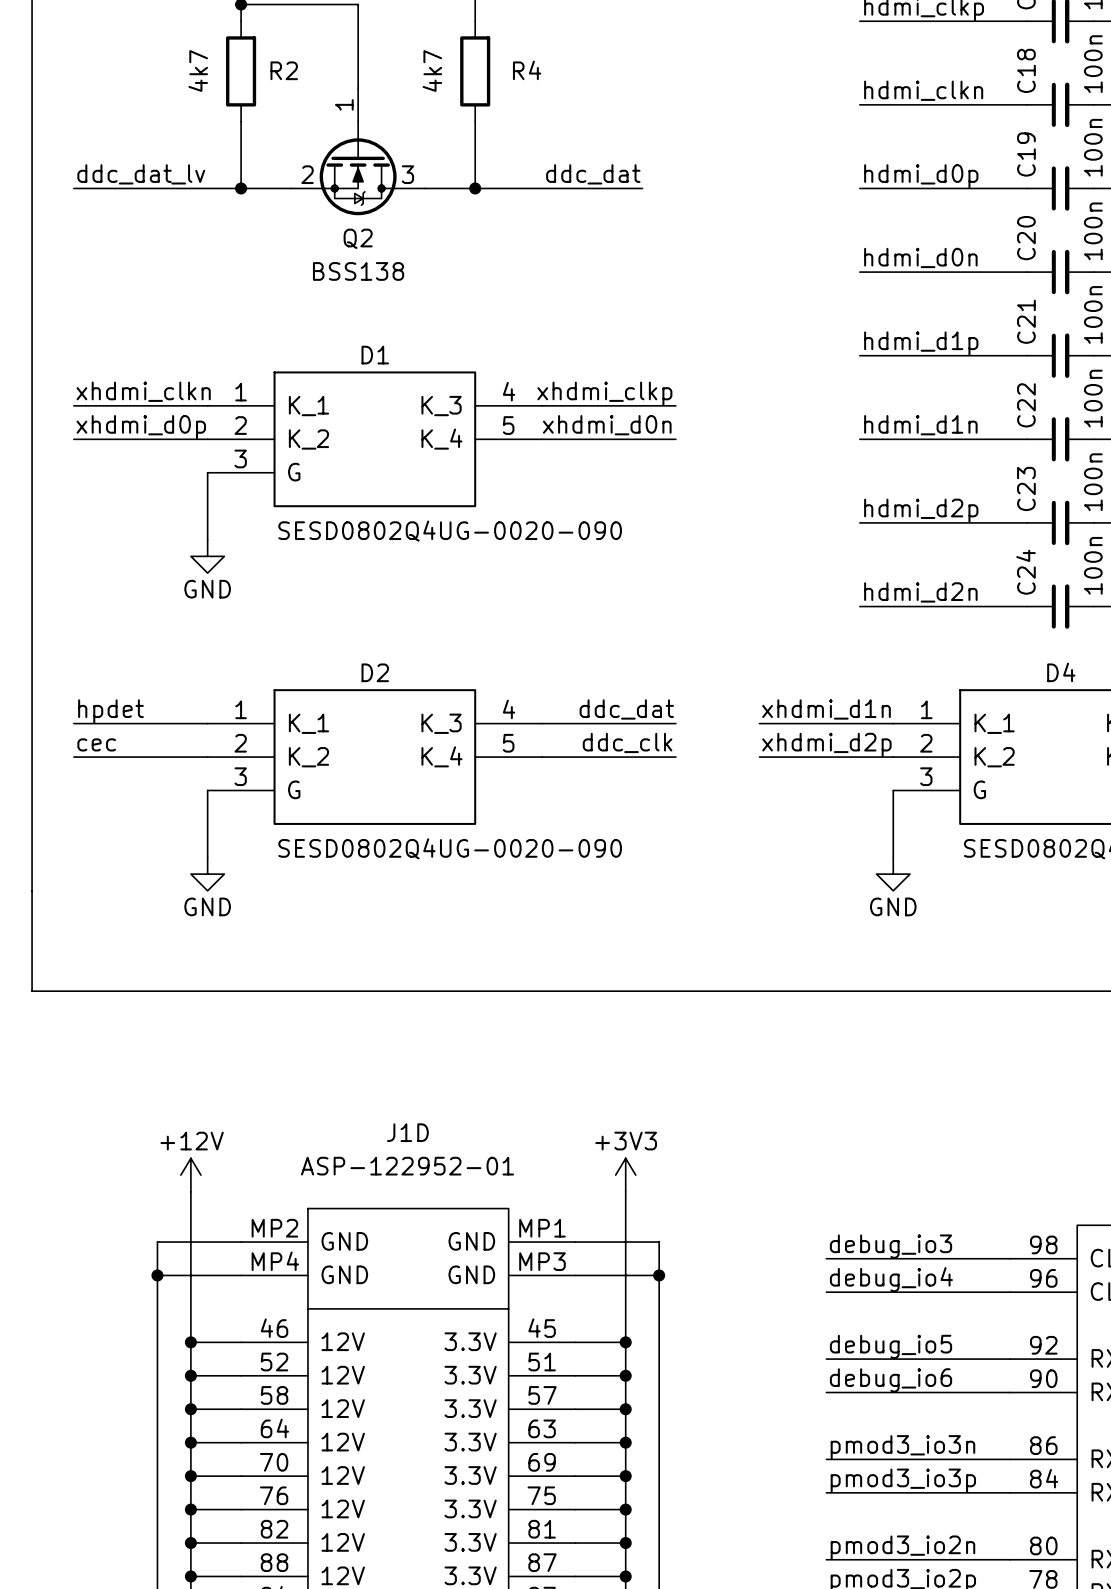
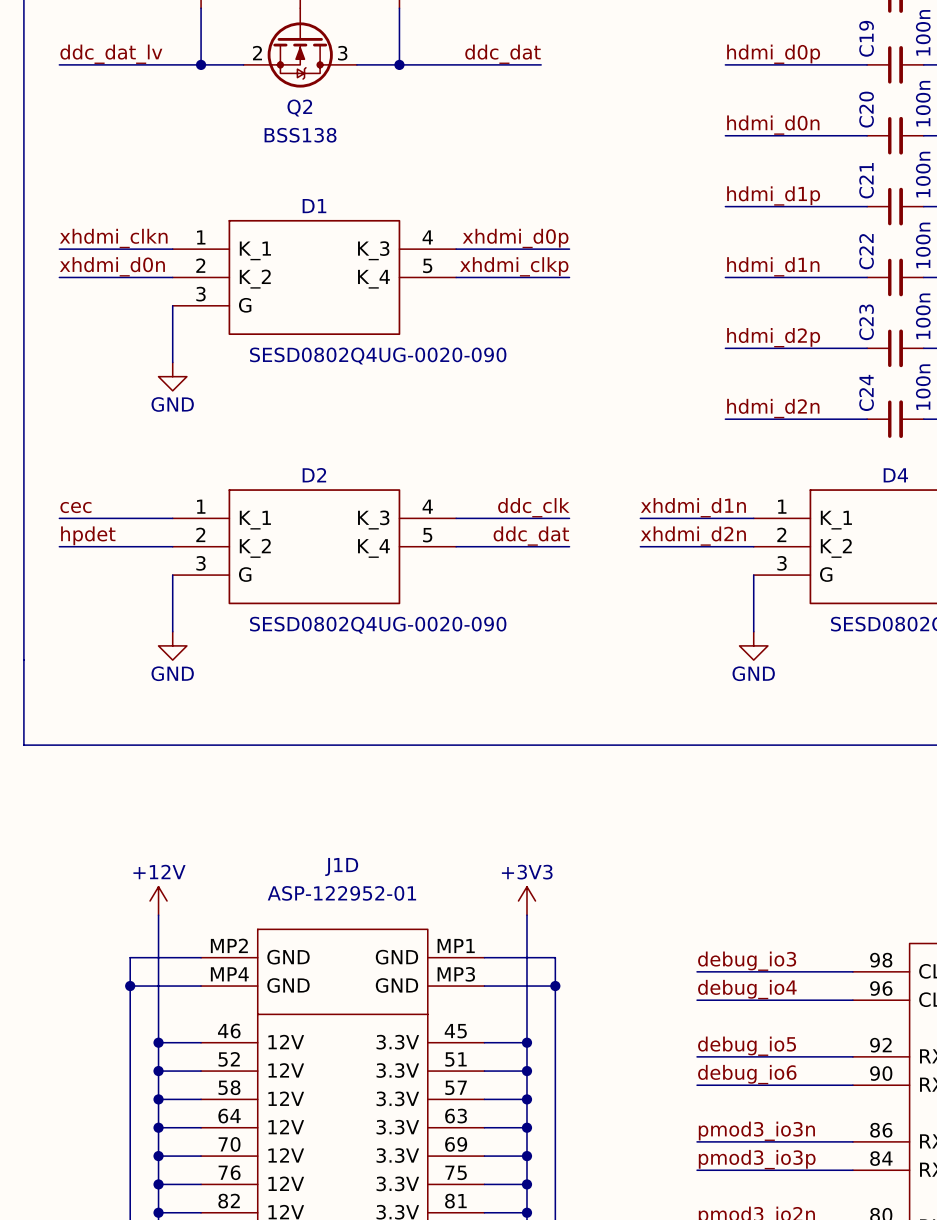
label: xhdmi_clkp (604, 393) -> xhdmi_d0p (515, 238)
label: xhdmi_d0n (607, 425) -> xhdmi_clkp (514, 266)
label: xhdmi_d0p (141, 427) -> xhdmi_d0n (112, 266)
label: ddc_dat (626, 709) -> ddc_clk (533, 507)
label: hpdet (111, 711) -> cec (75, 507)
label: ddc_clk (627, 742) -> ddc_dat (531, 536)
label: cec (96, 744) -> hpdet (88, 535)
label: xhdmi_d2p (826, 744) -> xhdmi_d2n (693, 536)

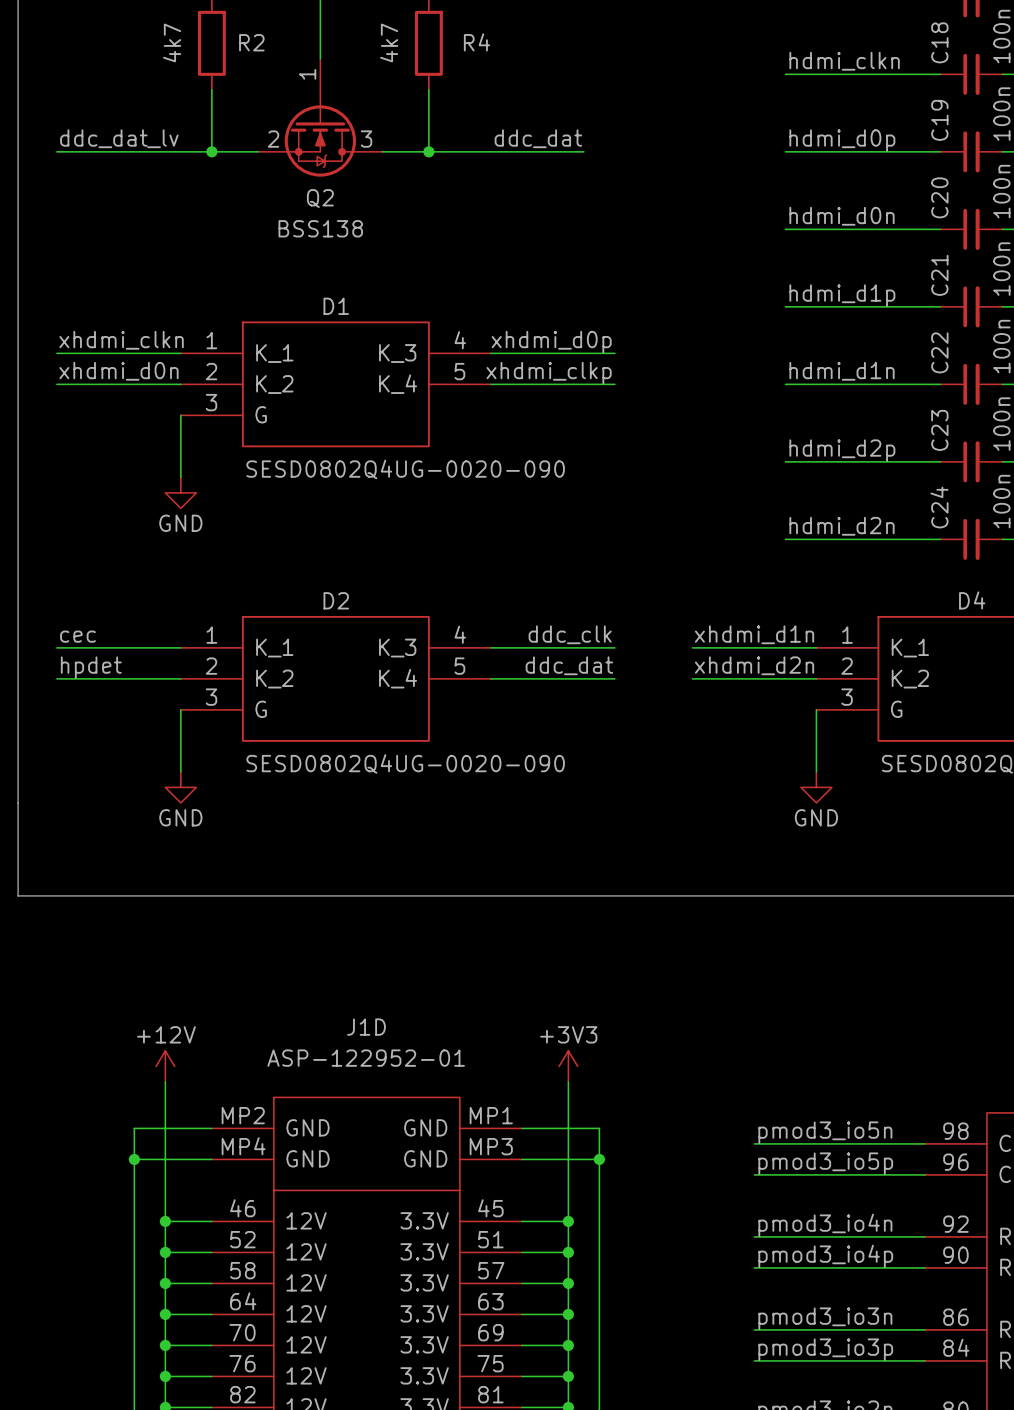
label: debug_io3 (747, 961) -> pmod3_io5n (825, 1132)
label: debug_io4 (747, 989) -> pmod3_io5p (825, 1163)
label: debug_io5 (747, 1046) -> pmod3_io4n (825, 1225)
label: debug_io6 (747, 1074) -> pmod3_io4p (825, 1256)

